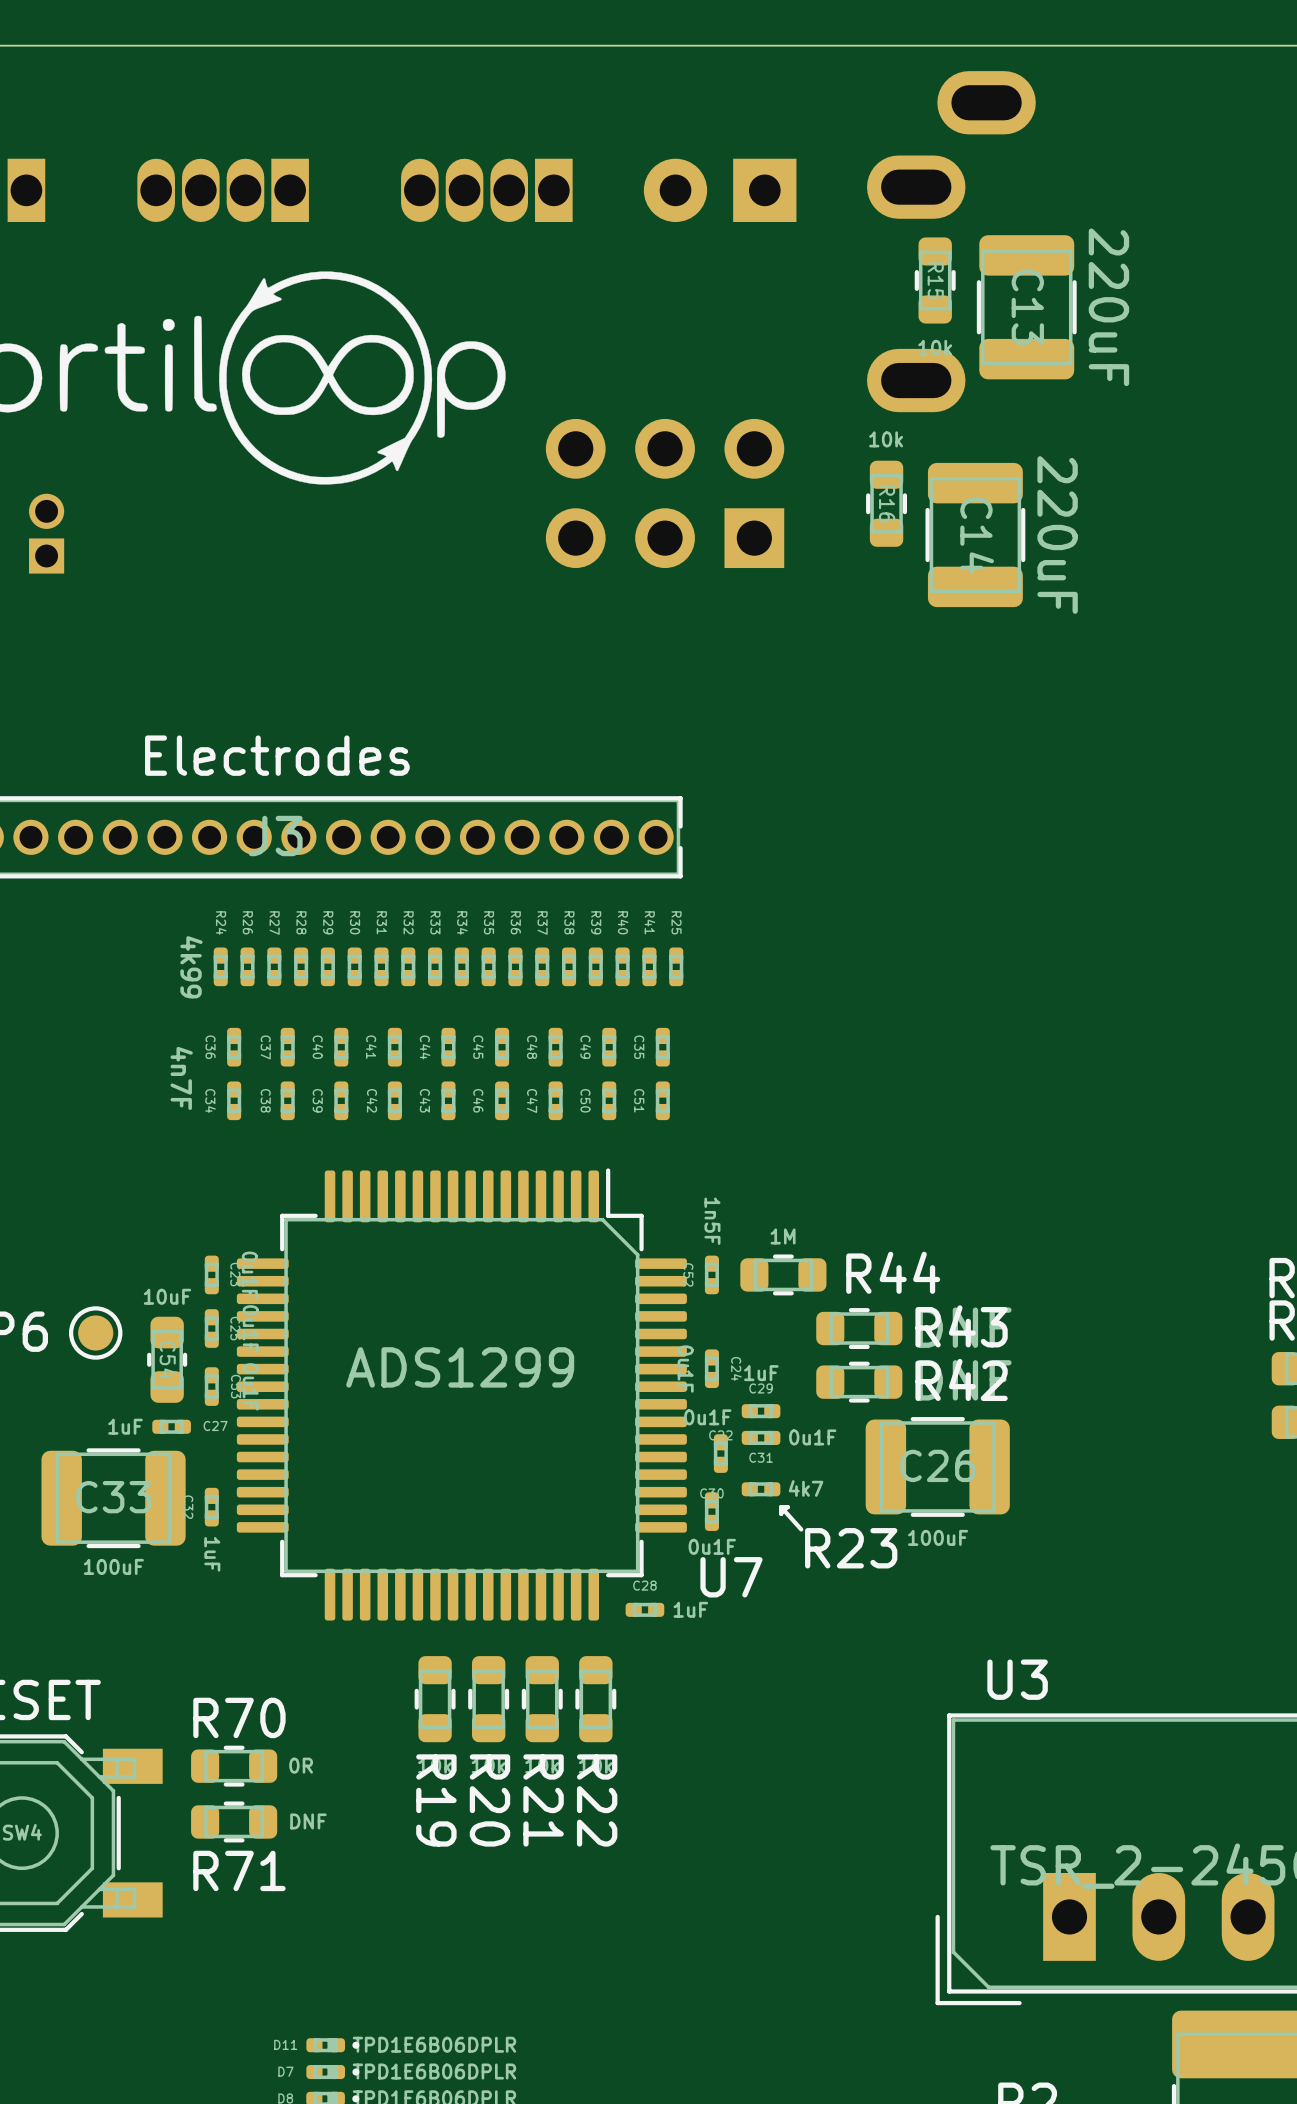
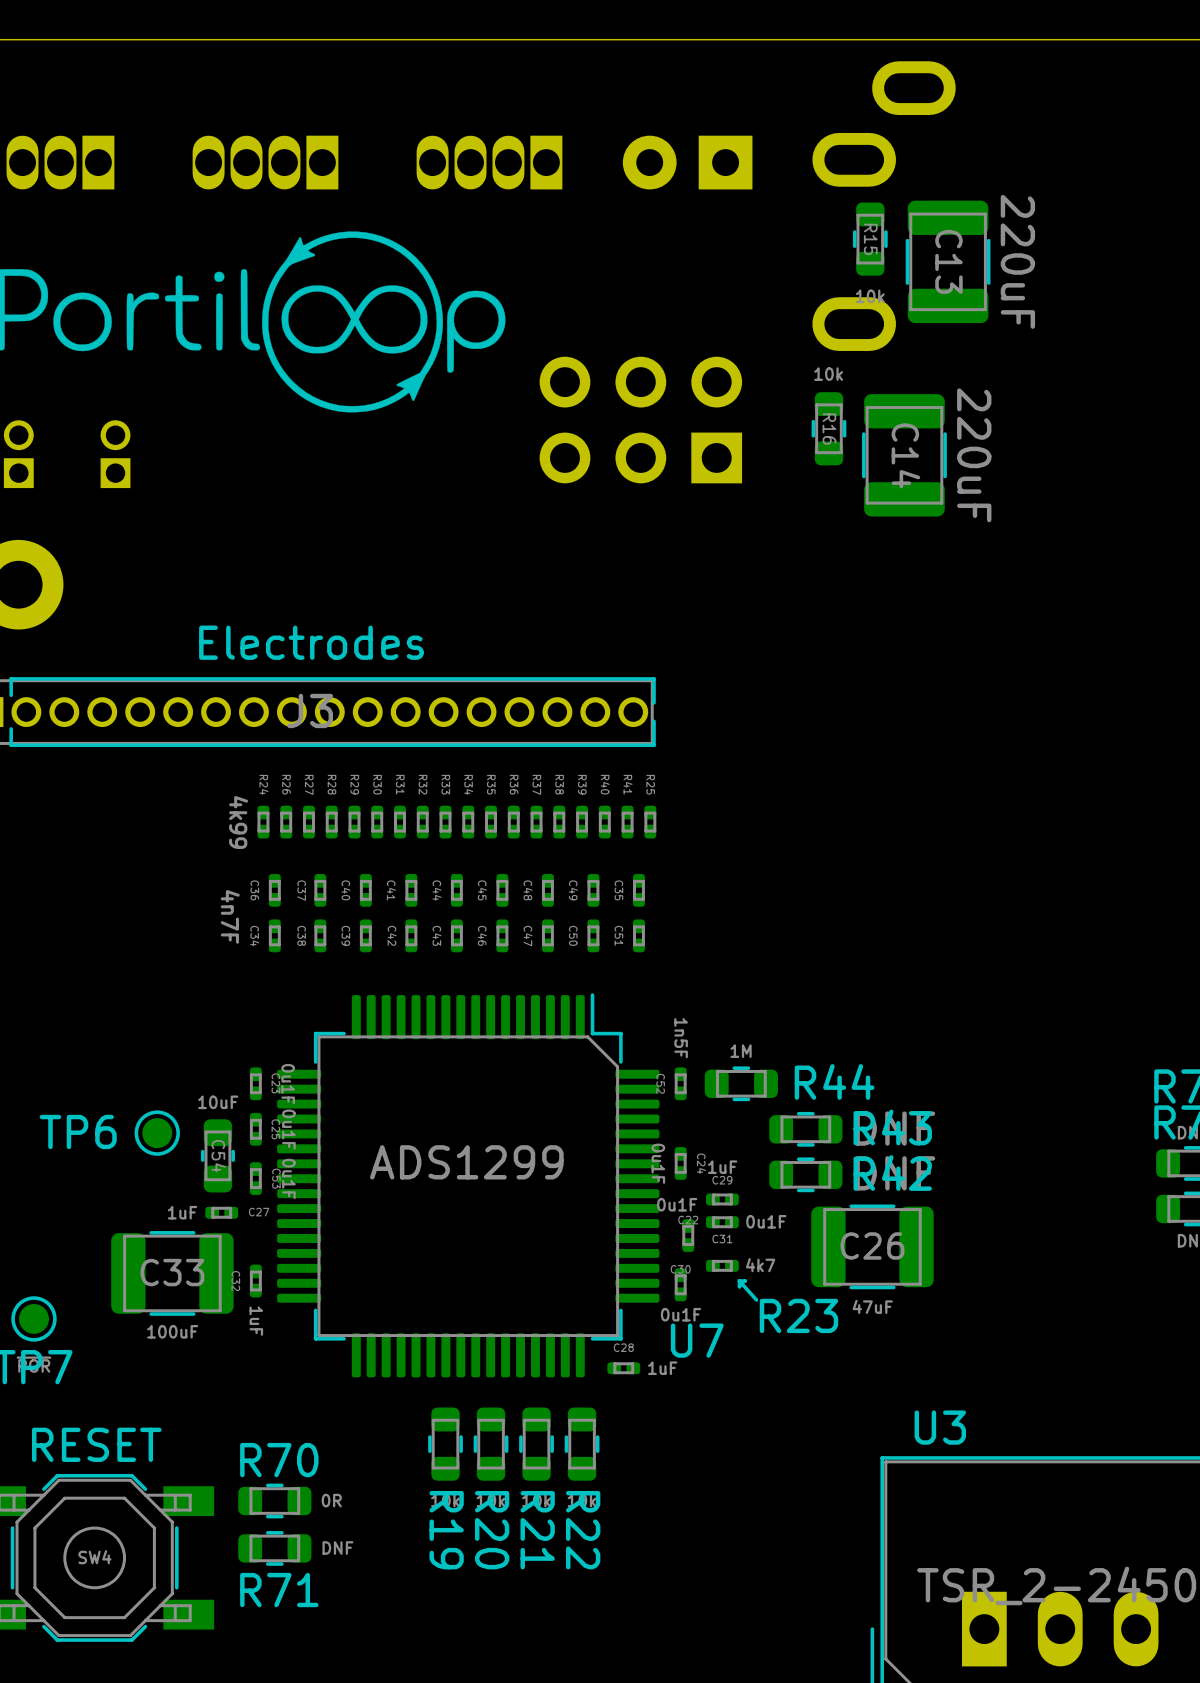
C26 value: 100uF (938, 1537) -> 47uF (872, 1306)

